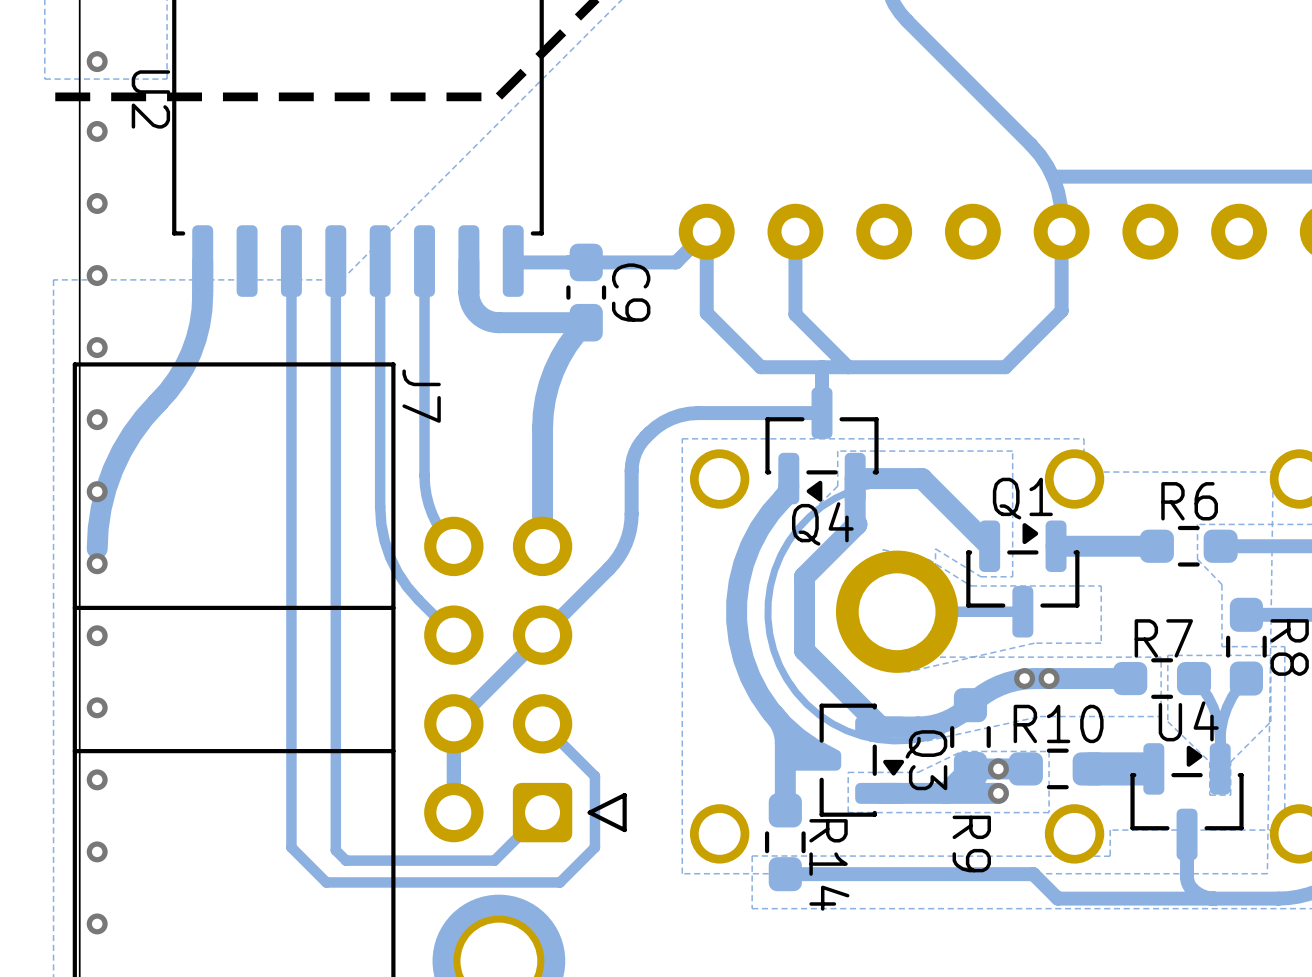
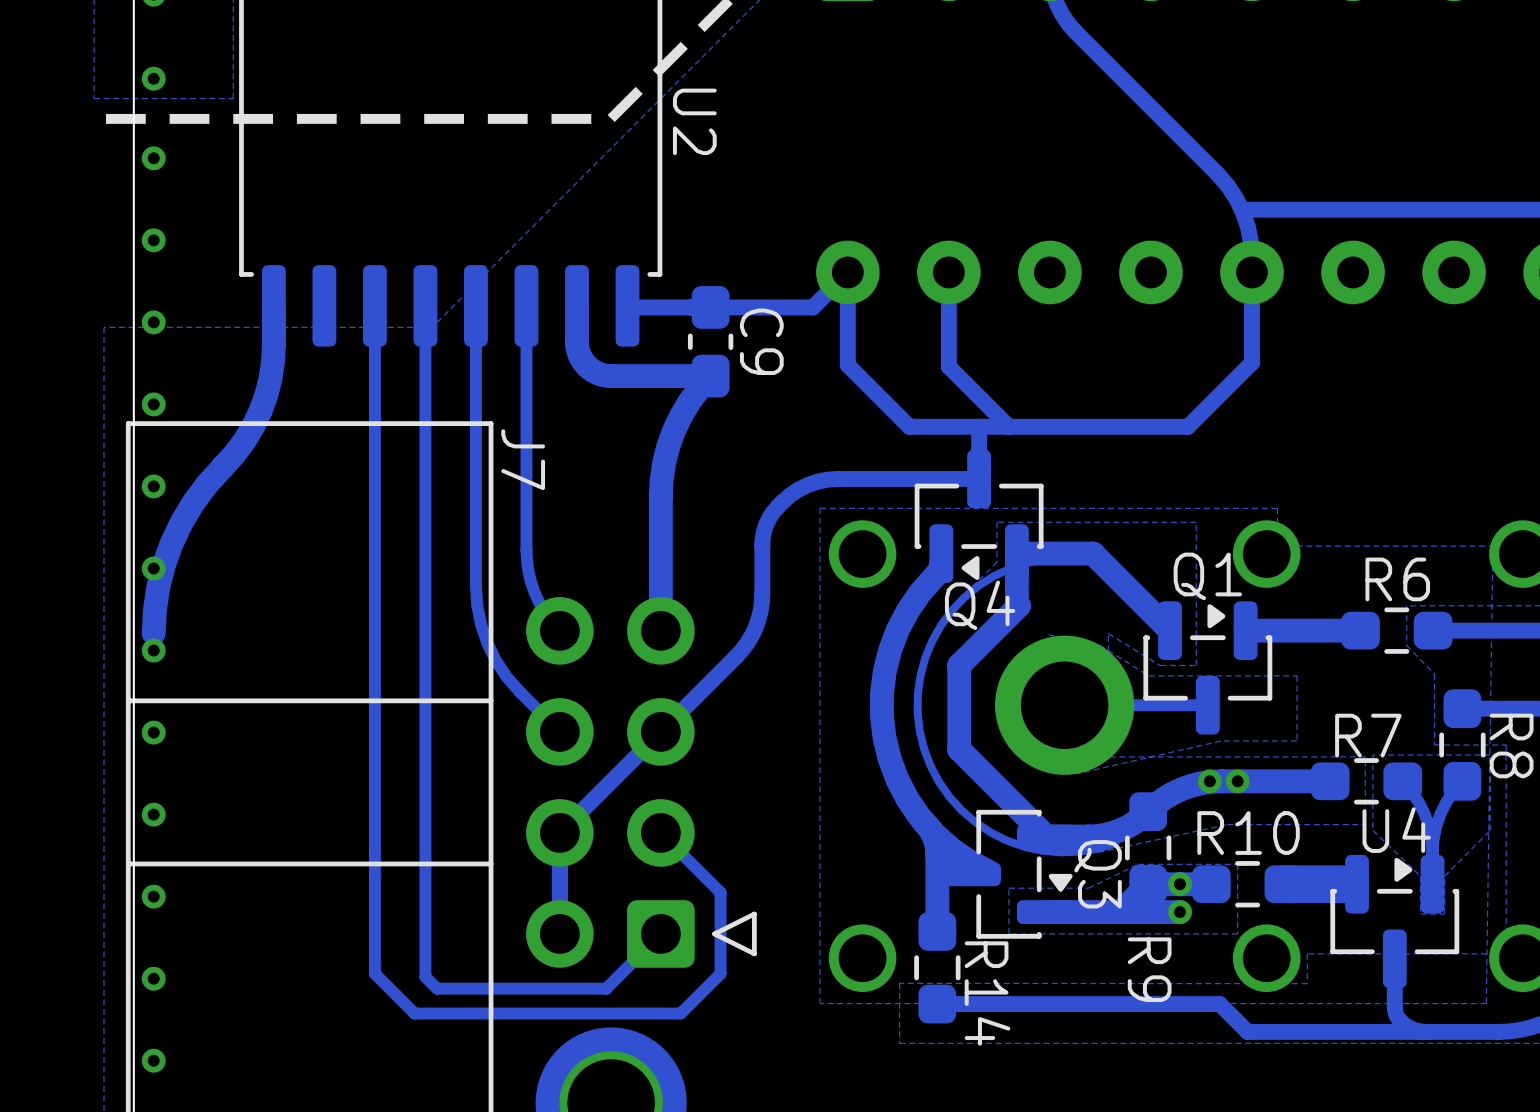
U2 name position: U2 (150, 99) -> U2 (694, 121)

